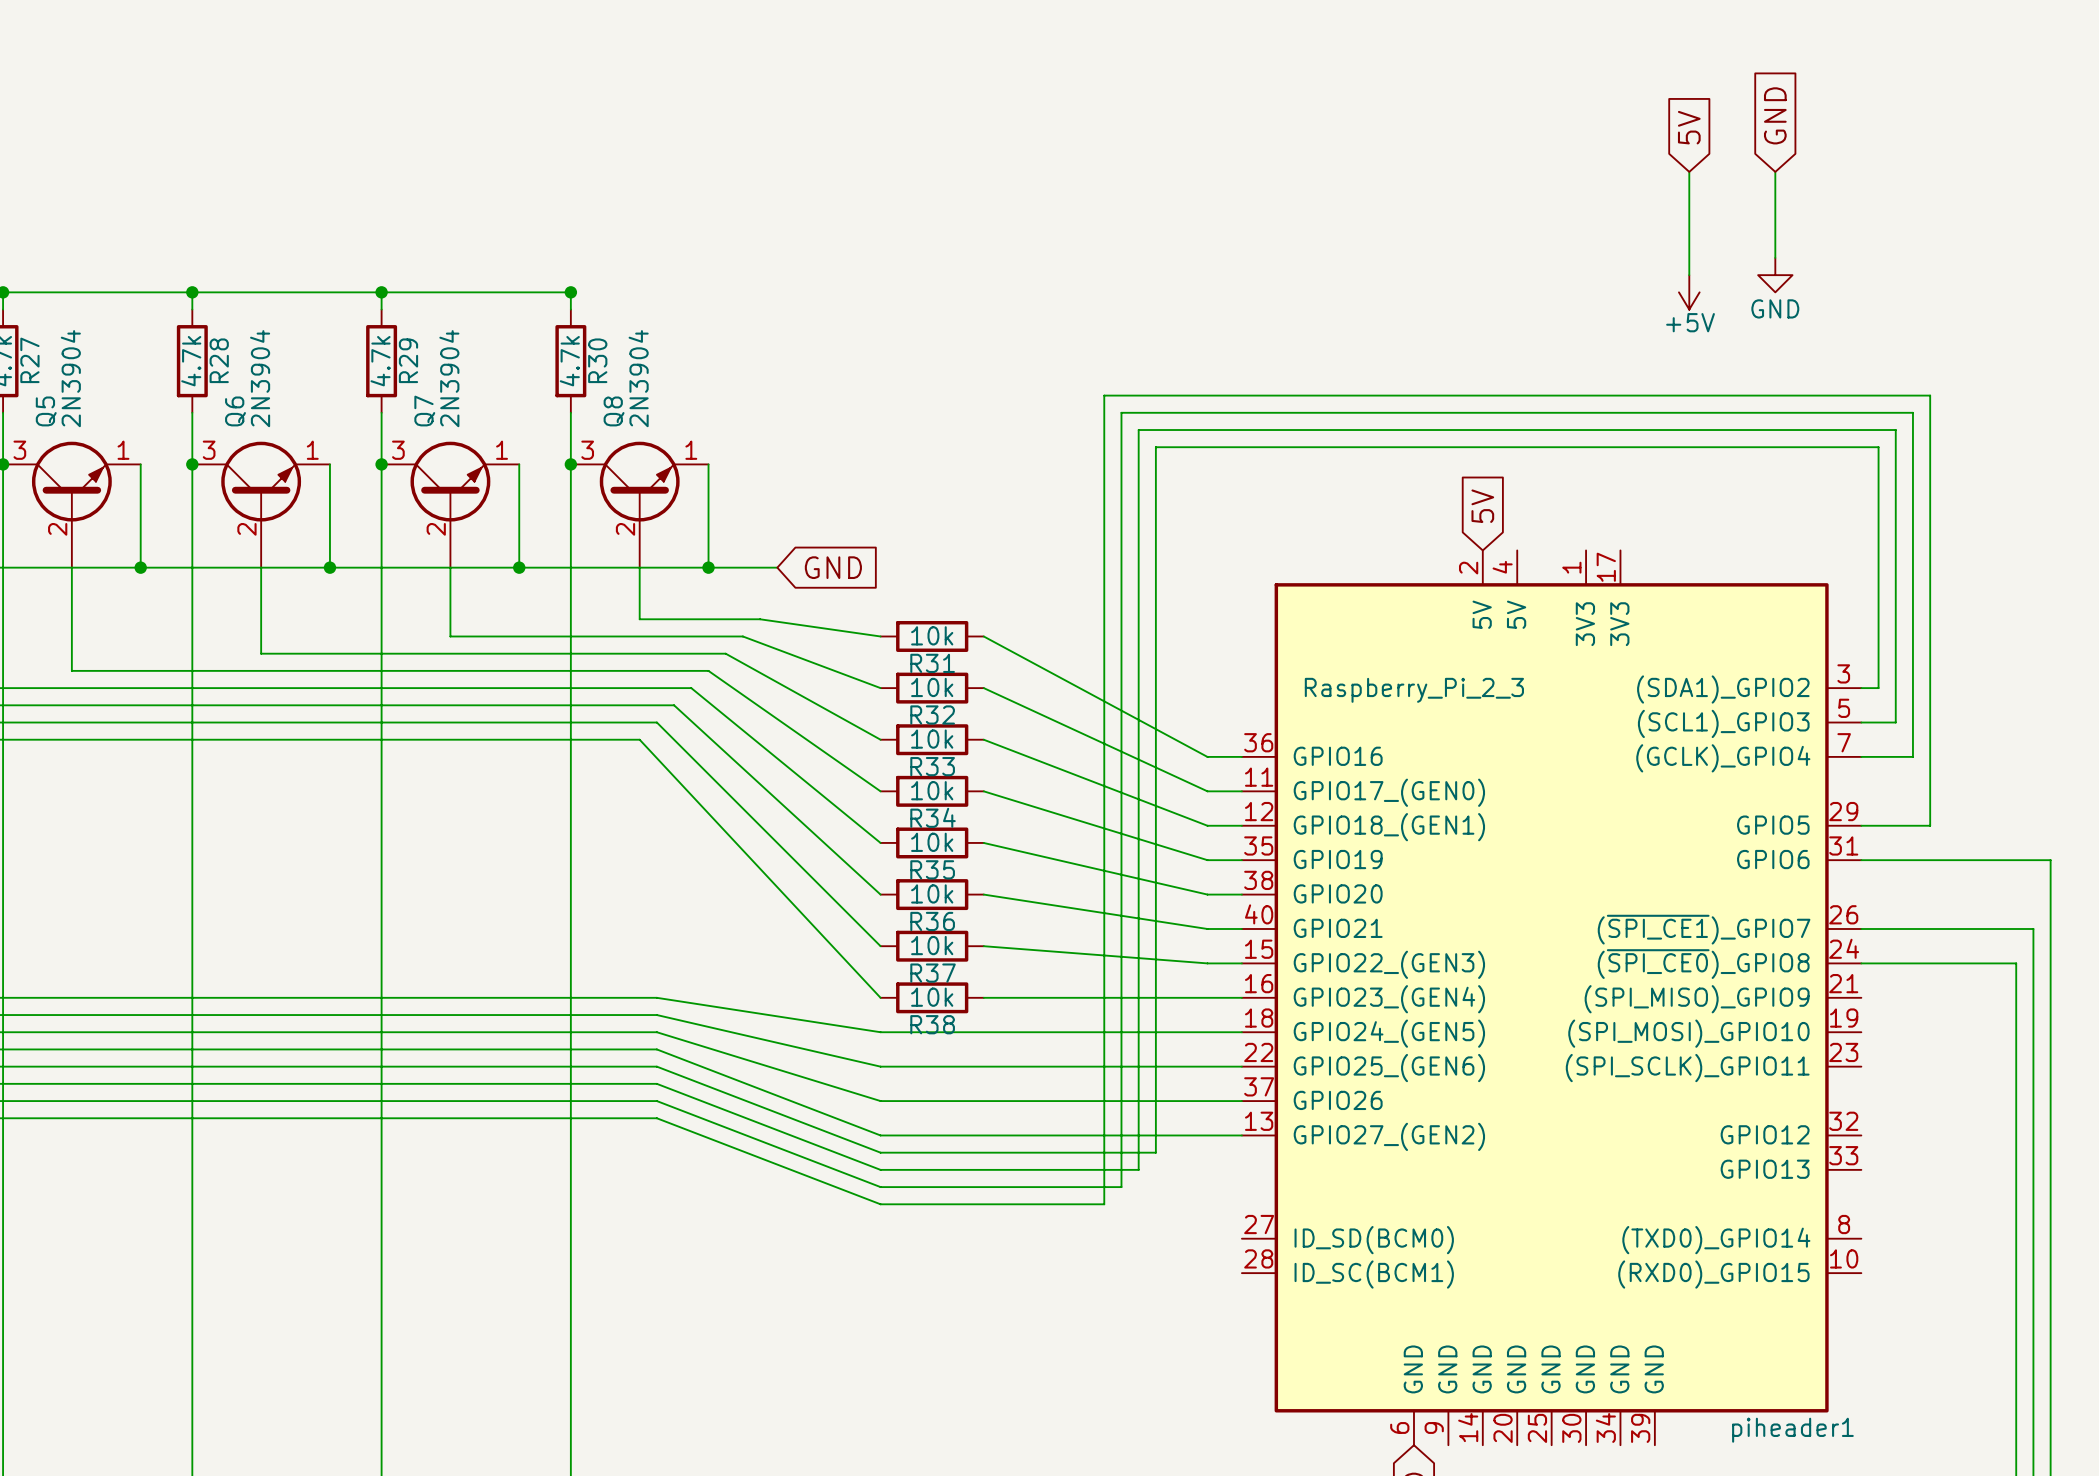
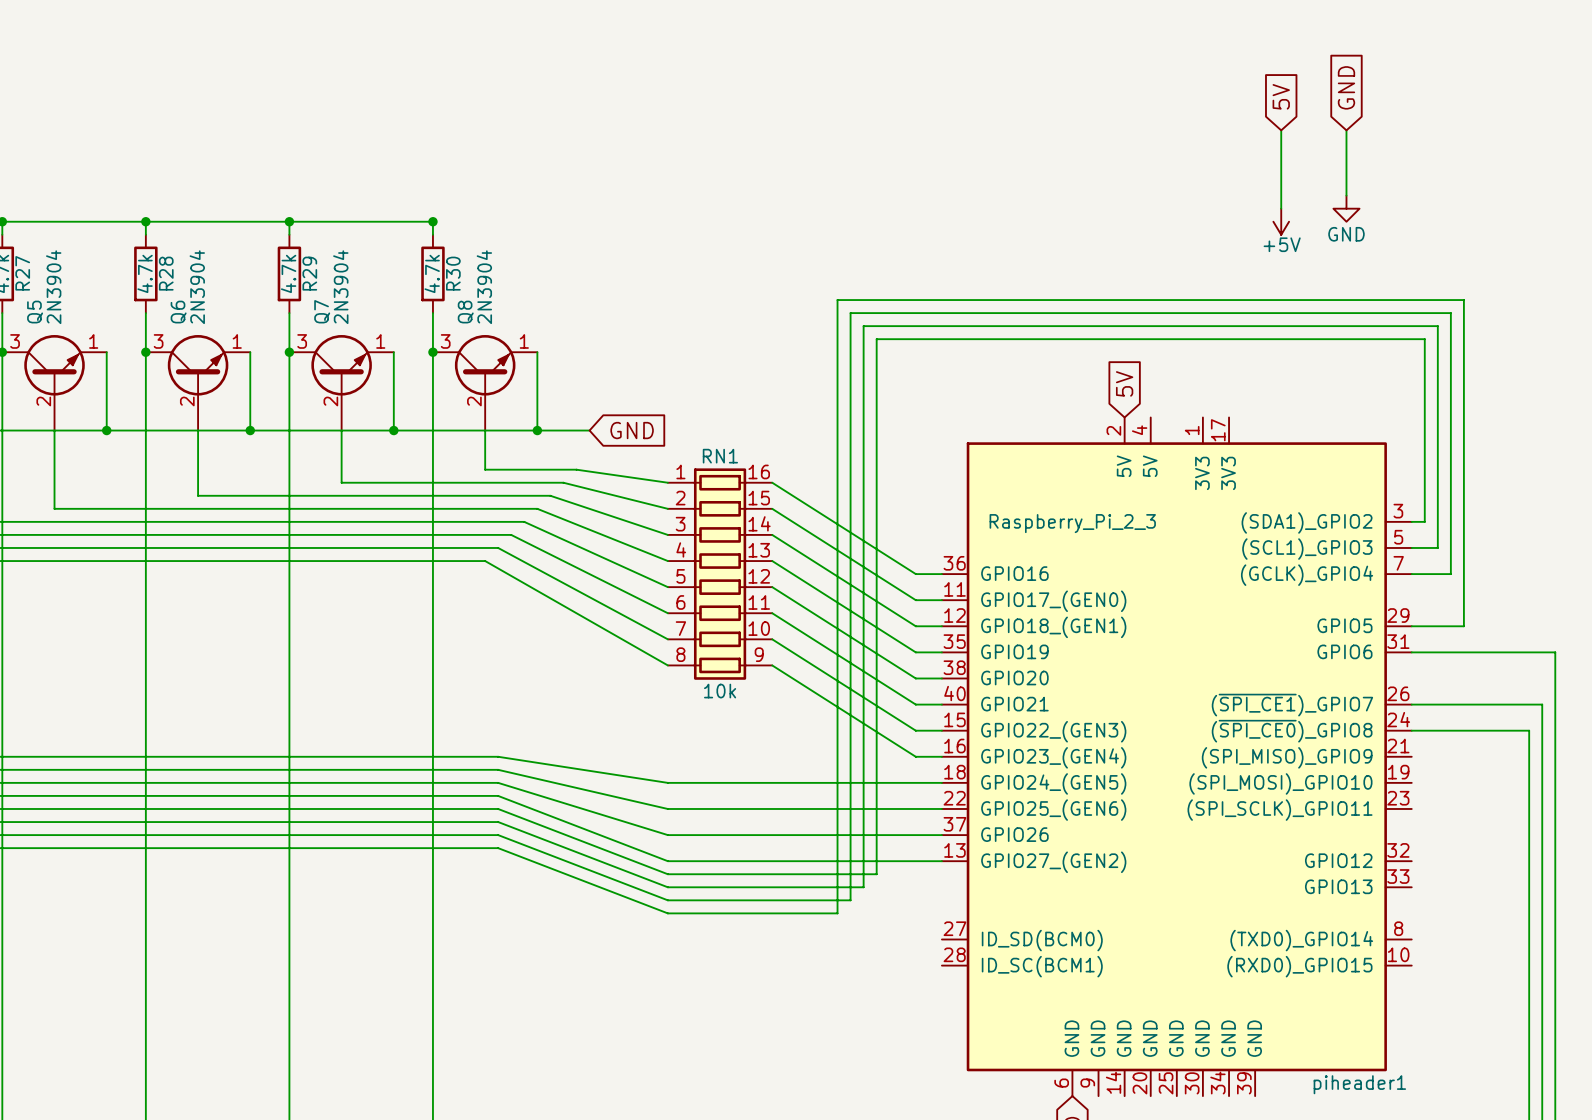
wire: (742, 636) (880, 688) -> (563, 482) (667, 508)
R31: 10k (932, 636) -> none
wire: (983, 636) (1207, 756) -> (772, 482) (915, 574)
wire: (725, 653) (880, 739) -> (537, 508) (667, 561)
wire: none -> (550, 495) (667, 534)
wire: (708, 670) (880, 791) -> none
wire: (691, 688) (880, 842) -> (498, 547) (667, 639)
wire: none -> (524, 521) (667, 587)
R32: 10k (932, 688) -> none
wire: (983, 688) (1207, 791) -> (772, 508) (915, 600)
wire: (674, 705) (880, 894) -> (511, 534) (667, 613)
wire: (656, 722) (880, 946) -> none
wire: (639, 739) (880, 997) -> (485, 561) (667, 665)
R33: 10k (932, 739) -> none
wire: (983, 739) (1207, 825) -> (772, 534) (915, 626)
RN1: none -> 10k (720, 574)
R34: 10k (932, 791) -> none
wire: (983, 791) (1207, 860) -> (772, 561) (915, 652)
R35: 10k (932, 842) -> none
wire: (983, 842) (1207, 894) -> (772, 587) (915, 678)
R36: 10k (932, 894) -> none
wire: (983, 894) (1207, 928) -> (772, 613) (915, 704)
R37: 10k (932, 946) -> none
wire: (983, 946) (1207, 963) -> (772, 639) (915, 730)
R38: 10k (932, 997) -> none
wire: (983, 997) (1207, 997) -> (772, 665) (915, 756)

